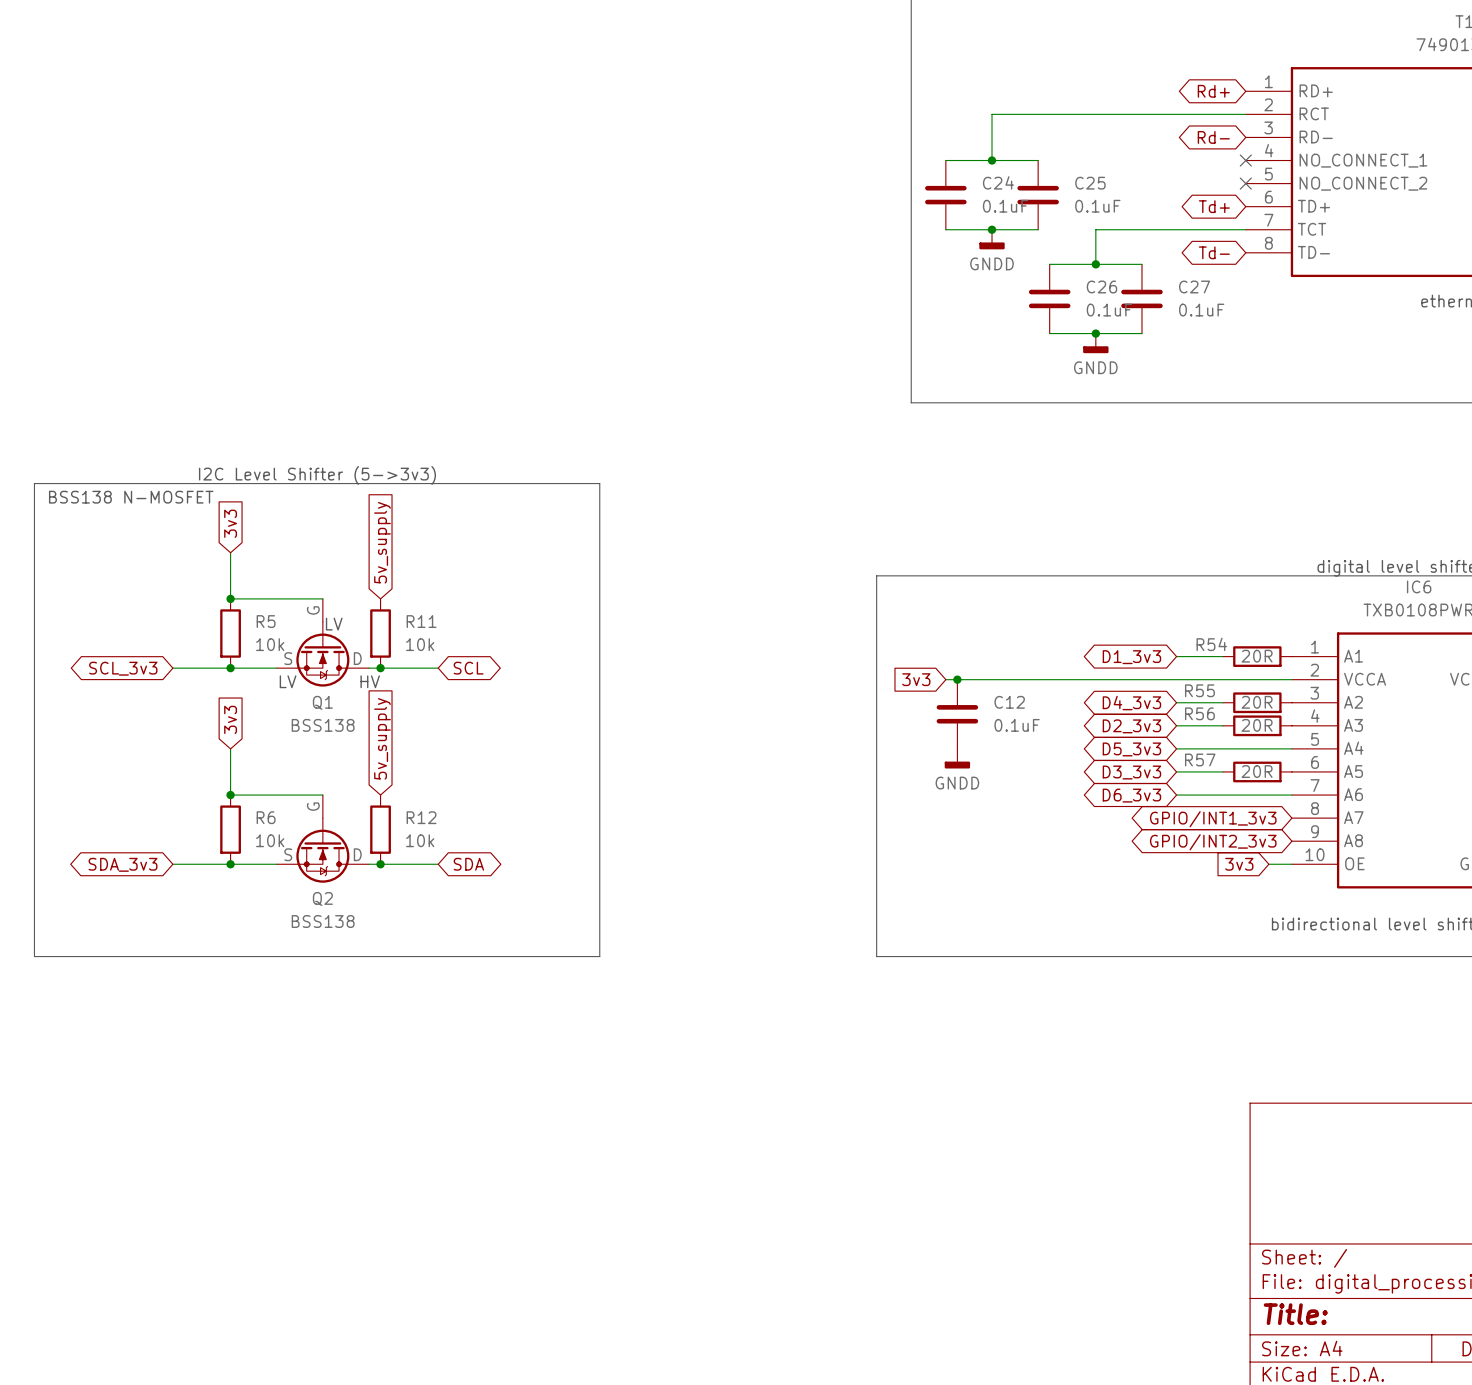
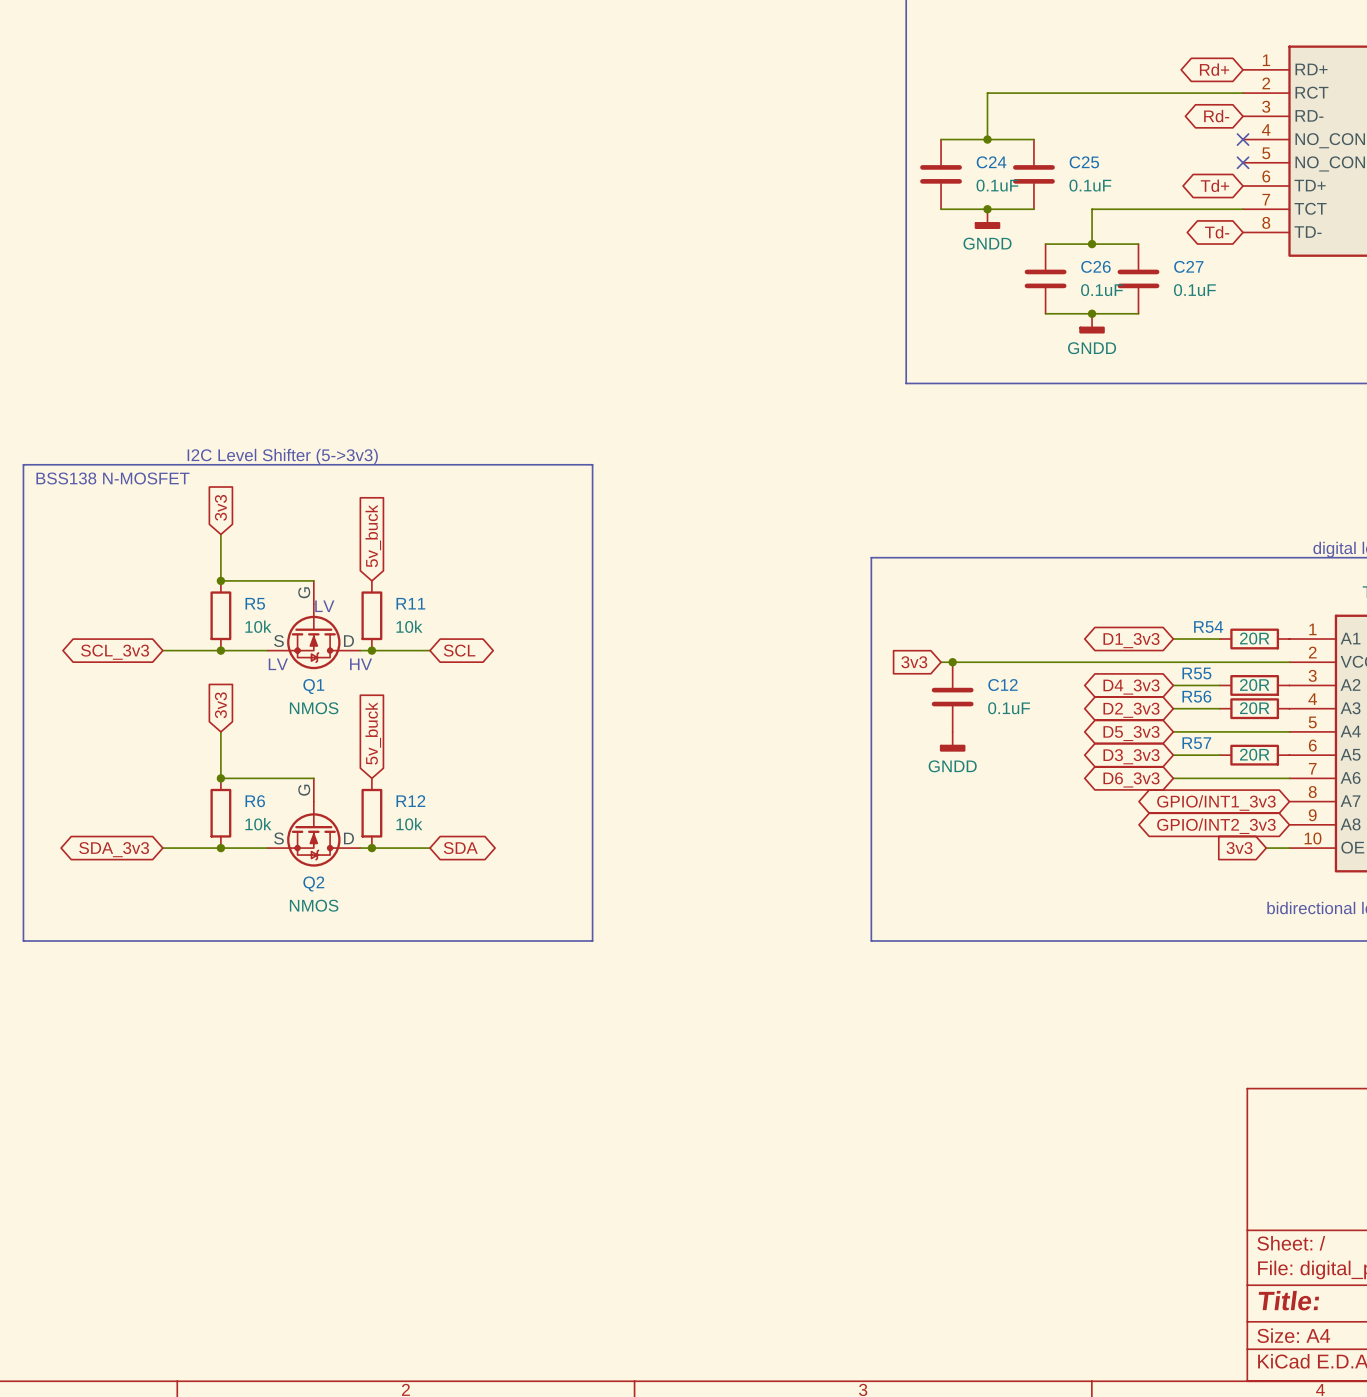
global label: 5v_supply (382, 542) -> 5v_buck (373, 536)
Q1 value: BSS138 (323, 725) -> NMOS (314, 708)
global label: 5v_supply (382, 738) -> 5v_buck (373, 733)
Q2 value: BSS138 (323, 921) -> NMOS (314, 905)

